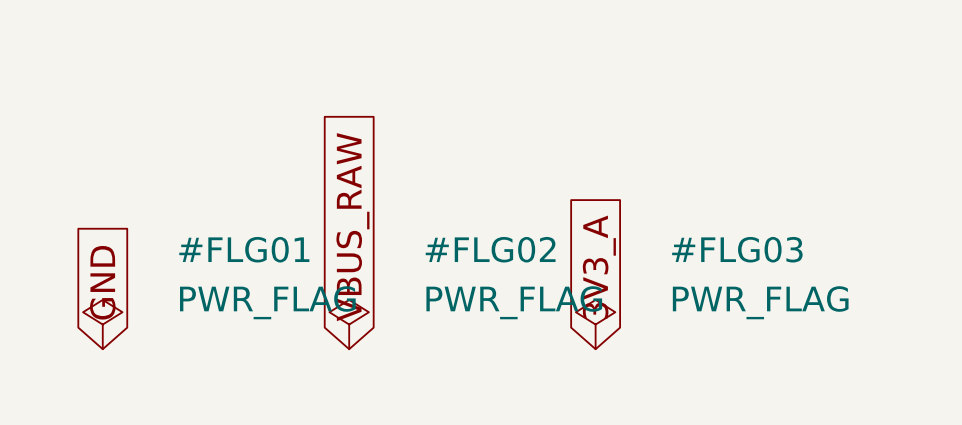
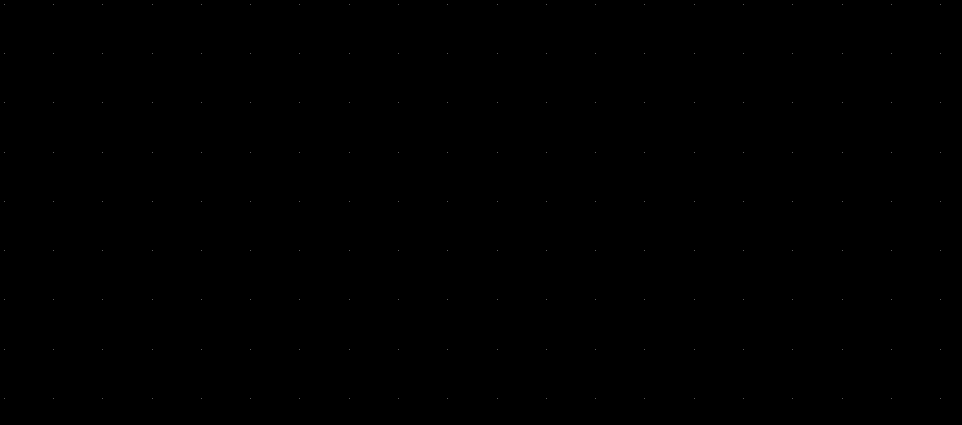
global label: VBUS_RAW (352, 227) -> none
global label: 3V3_A (599, 267) -> none
global label: GND (102, 282) -> none
#FLG01: PWR_FLAG (102, 324) -> none
#FLG02: PWR_FLAG (349, 324) -> none
#FLG03: PWR_FLAG (595, 324) -> none

